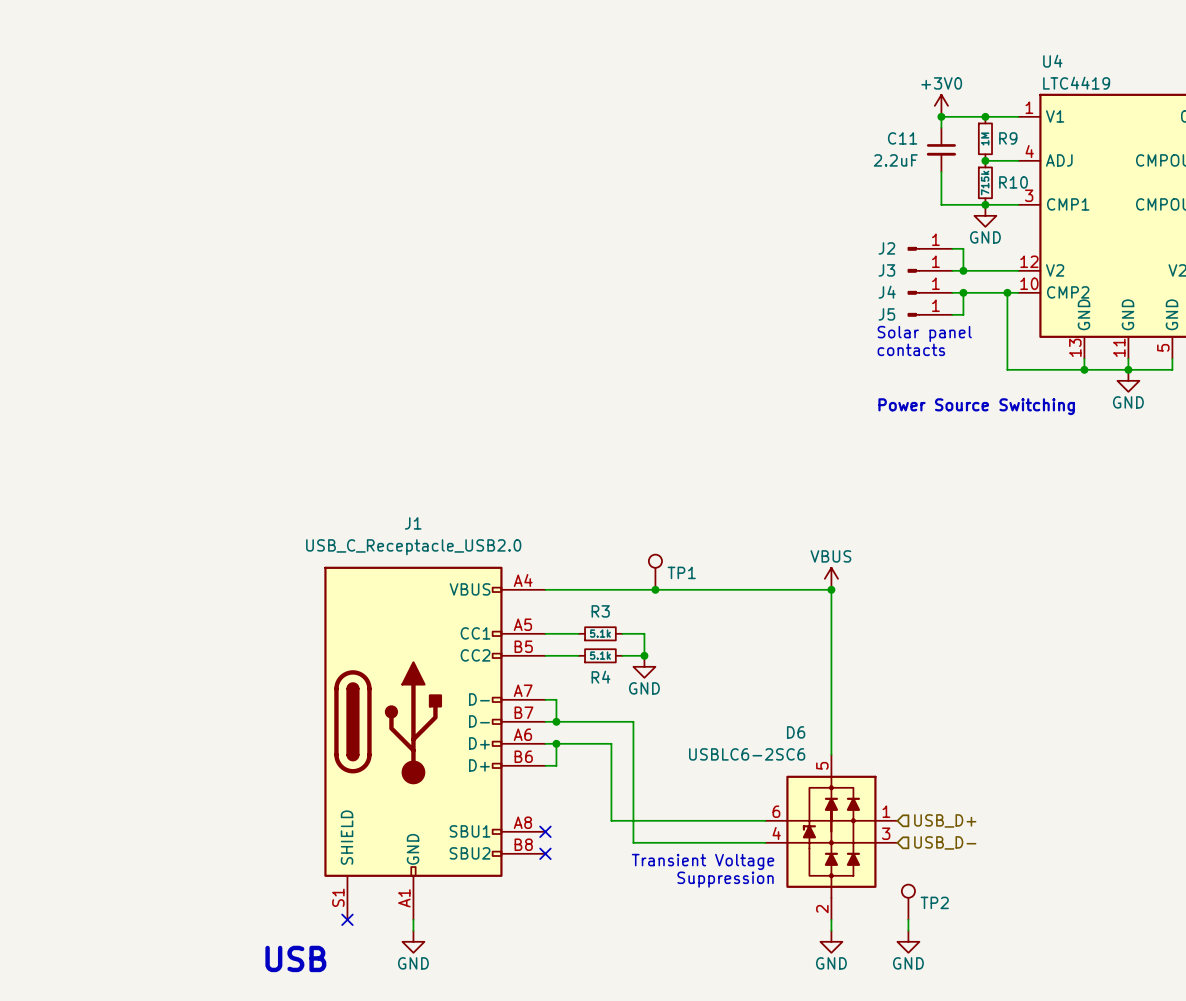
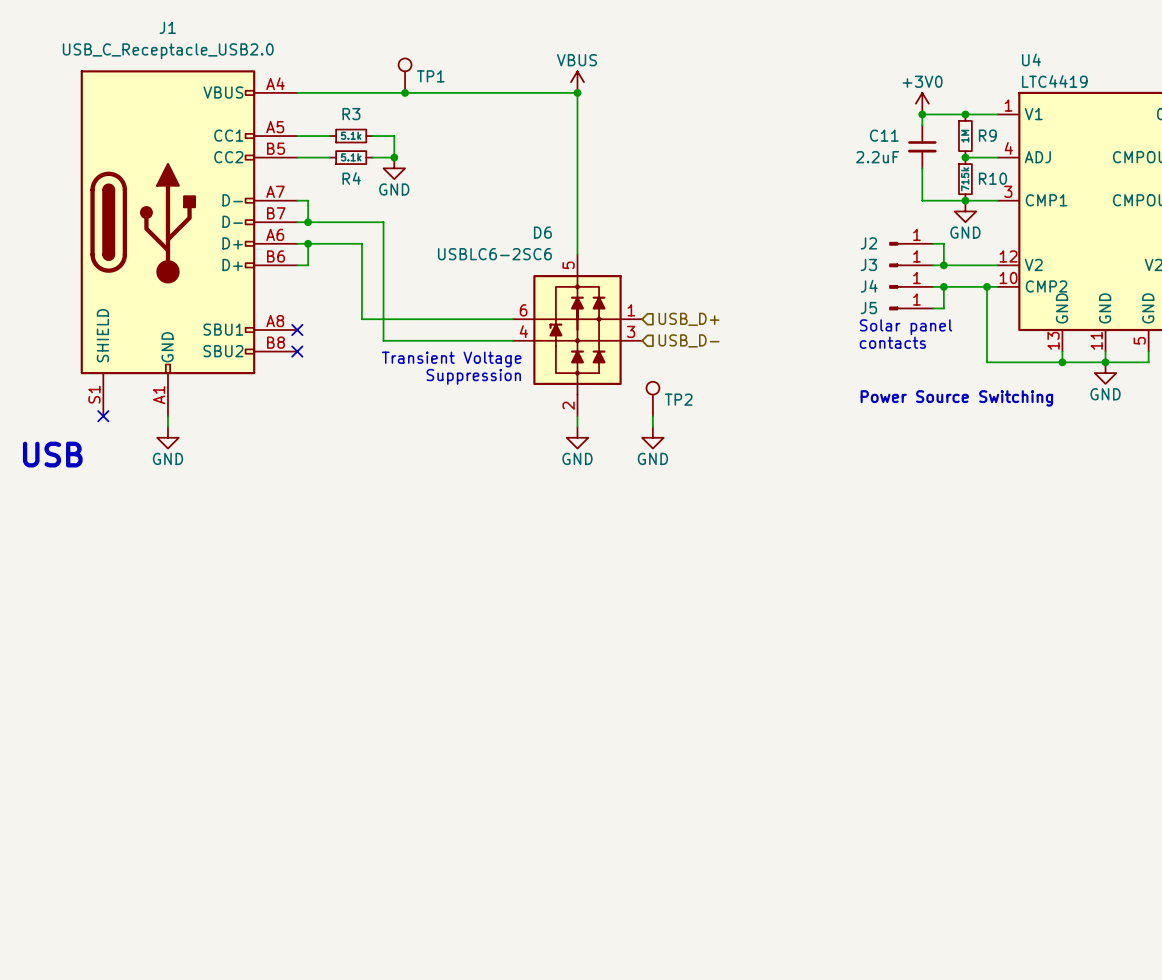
power symbol: none -> VBUS (577, 82)
wire: none -> (297, 92) (577, 92) (577, 254)
junction: none -> (405, 92)
junction: none -> (577, 92)
wire: none -> (297, 136) (329, 136)
wire: none -> (372, 136) (394, 136) (394, 157) (372, 157)
wire: none -> (297, 157) (329, 157)
junction: none -> (394, 157)
power symbol: none -> GND (394, 168)
wire: none -> (297, 200) (308, 200) (308, 222)
wire: none -> (297, 222) (383, 222) (383, 340) (512, 340)
junction: none -> (308, 222)
wire: none -> (297, 243) (361, 243) (361, 319) (512, 319)
wire: none -> (308, 243) (308, 265) (297, 265)
junction: none -> (308, 243)
hierarchical label: none -> USB_D+ (689, 319)
no-connect mark: none -> (297, 330)
hierarchical label: none -> USB_D- (689, 340)
no-connect mark: none -> (297, 351)
text: none -> Transient Voltage (451, 359)
text: none -> Suppression (473, 376)
no-connect mark: none -> (103, 416)
wire: none -> (167, 416) (167, 426)
wire: none -> (577, 416) (577, 426)
wire: none -> (652, 416) (652, 426)
power symbol: none -> GND (167, 437)
power symbol: none -> GND (577, 437)
power symbol: none -> GND (652, 437)
text: none -> USB (52, 454)
TP1 position: (655, 572) -> (405, 75)
power symbol: VBUS (831, 578) -> none
wire: (545, 589) (831, 589) (831, 754) -> none
junction: (655, 589) -> none
junction: (831, 589) -> none
wire: (545, 633) (578, 633) -> none
R3 position: (600, 633) -> (351, 136)
wire: (622, 633) (644, 633) (644, 655) (622, 655) -> none
wire: (545, 655) (578, 655) -> none
R4 position: (600, 655) -> (351, 157)
junction: (644, 655) -> none
power symbol: GND (644, 666) -> none
wire: (545, 699) (556, 699) (556, 721) -> none
wire: (545, 721) (633, 721) (633, 842) (765, 842) -> none
junction: (556, 721) -> none
J1 position: (434, 743) -> (189, 243)
wire: (545, 743) (611, 743) (611, 820) (765, 820) -> none
wire: (556, 743) (556, 765) (545, 765) -> none
junction: (556, 743) -> none
hierarchical label: USB_D+ (945, 820) -> none
no-connect mark: (545, 831) -> none
D6 position: (831, 837) -> (577, 335)
hierarchical label: USB_D- (945, 842) -> none
no-connect mark: (545, 853) -> none
text: Transient Voltage (703, 861) -> none
text: Suppression (725, 879) -> none
TP2 position: (908, 902) -> (652, 398)
no-connect mark: (347, 919) -> none
wire: (413, 919) (413, 930) -> none
wire: (831, 919) (831, 930) -> none
wire: (908, 919) (908, 930) -> none
power symbol: GND (413, 941) -> none
power symbol: GND (831, 941) -> none
power symbol: GND (908, 941) -> none
text: USB (295, 958) -> none

